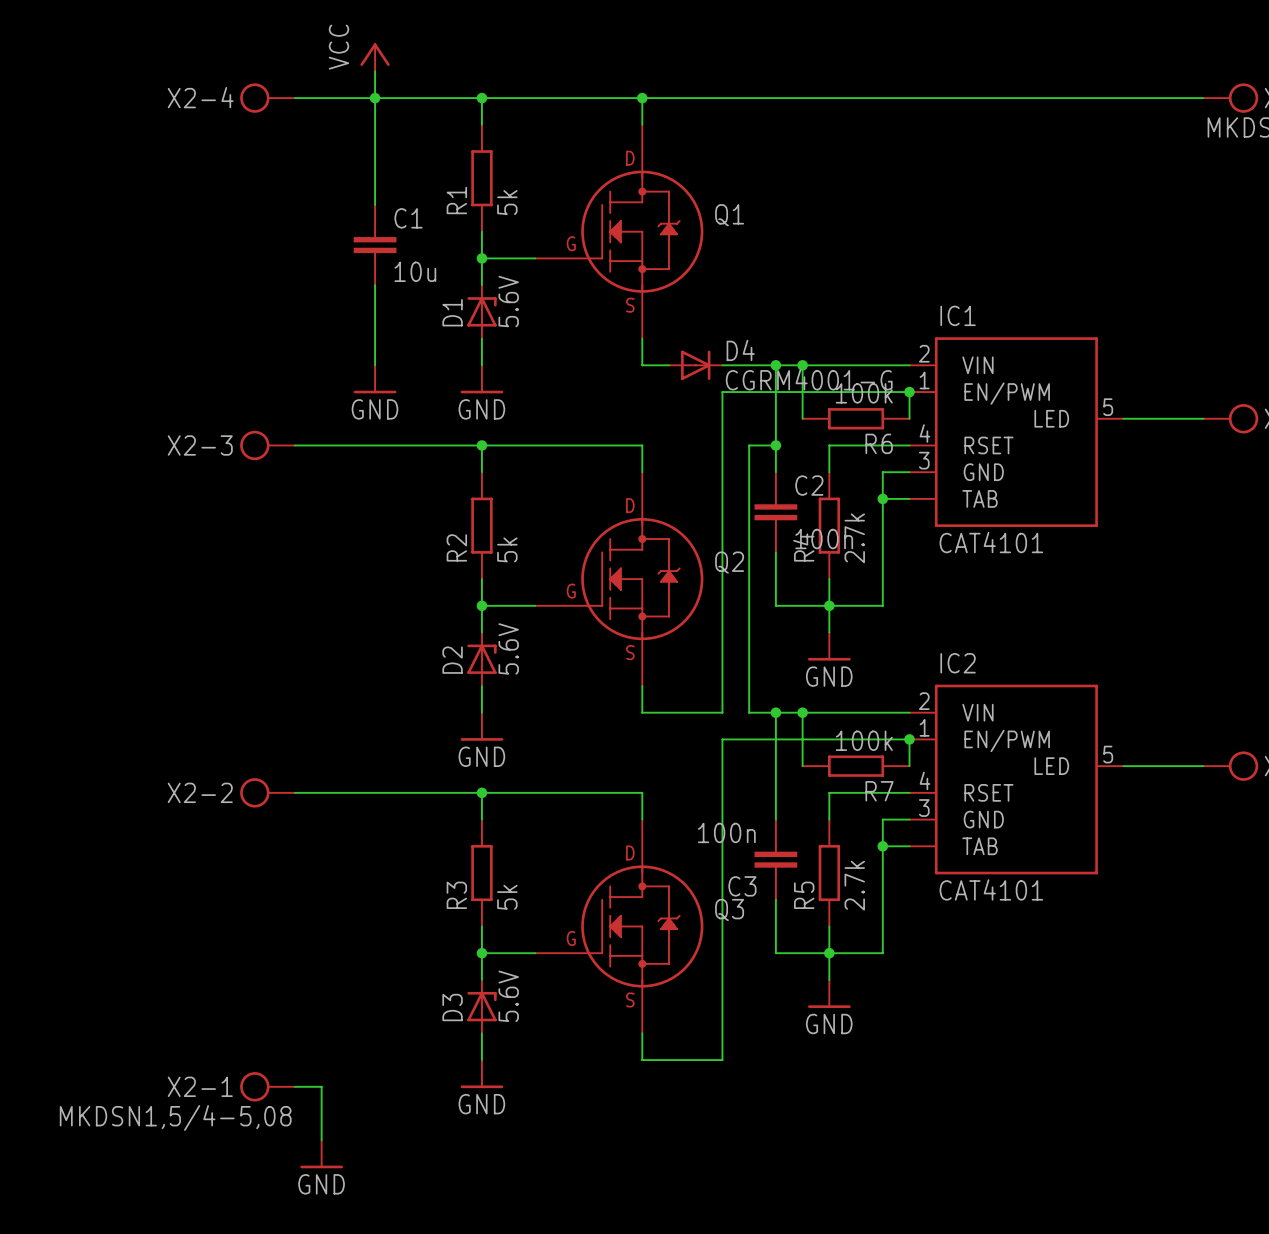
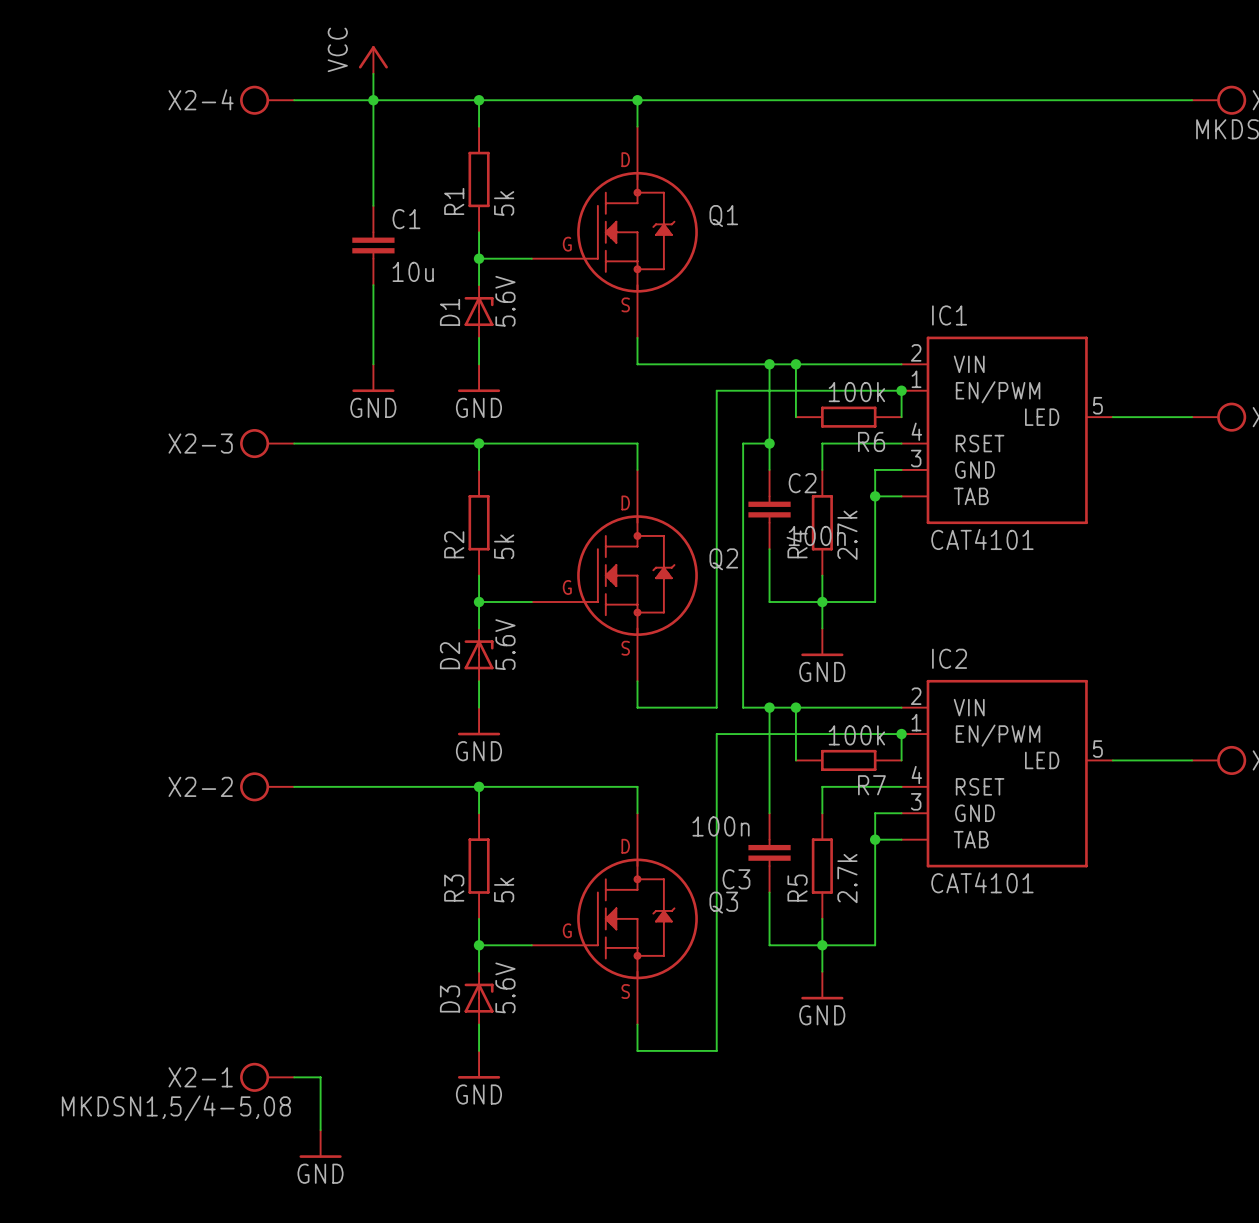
D4: CGRM4001-G (695, 365) -> none

